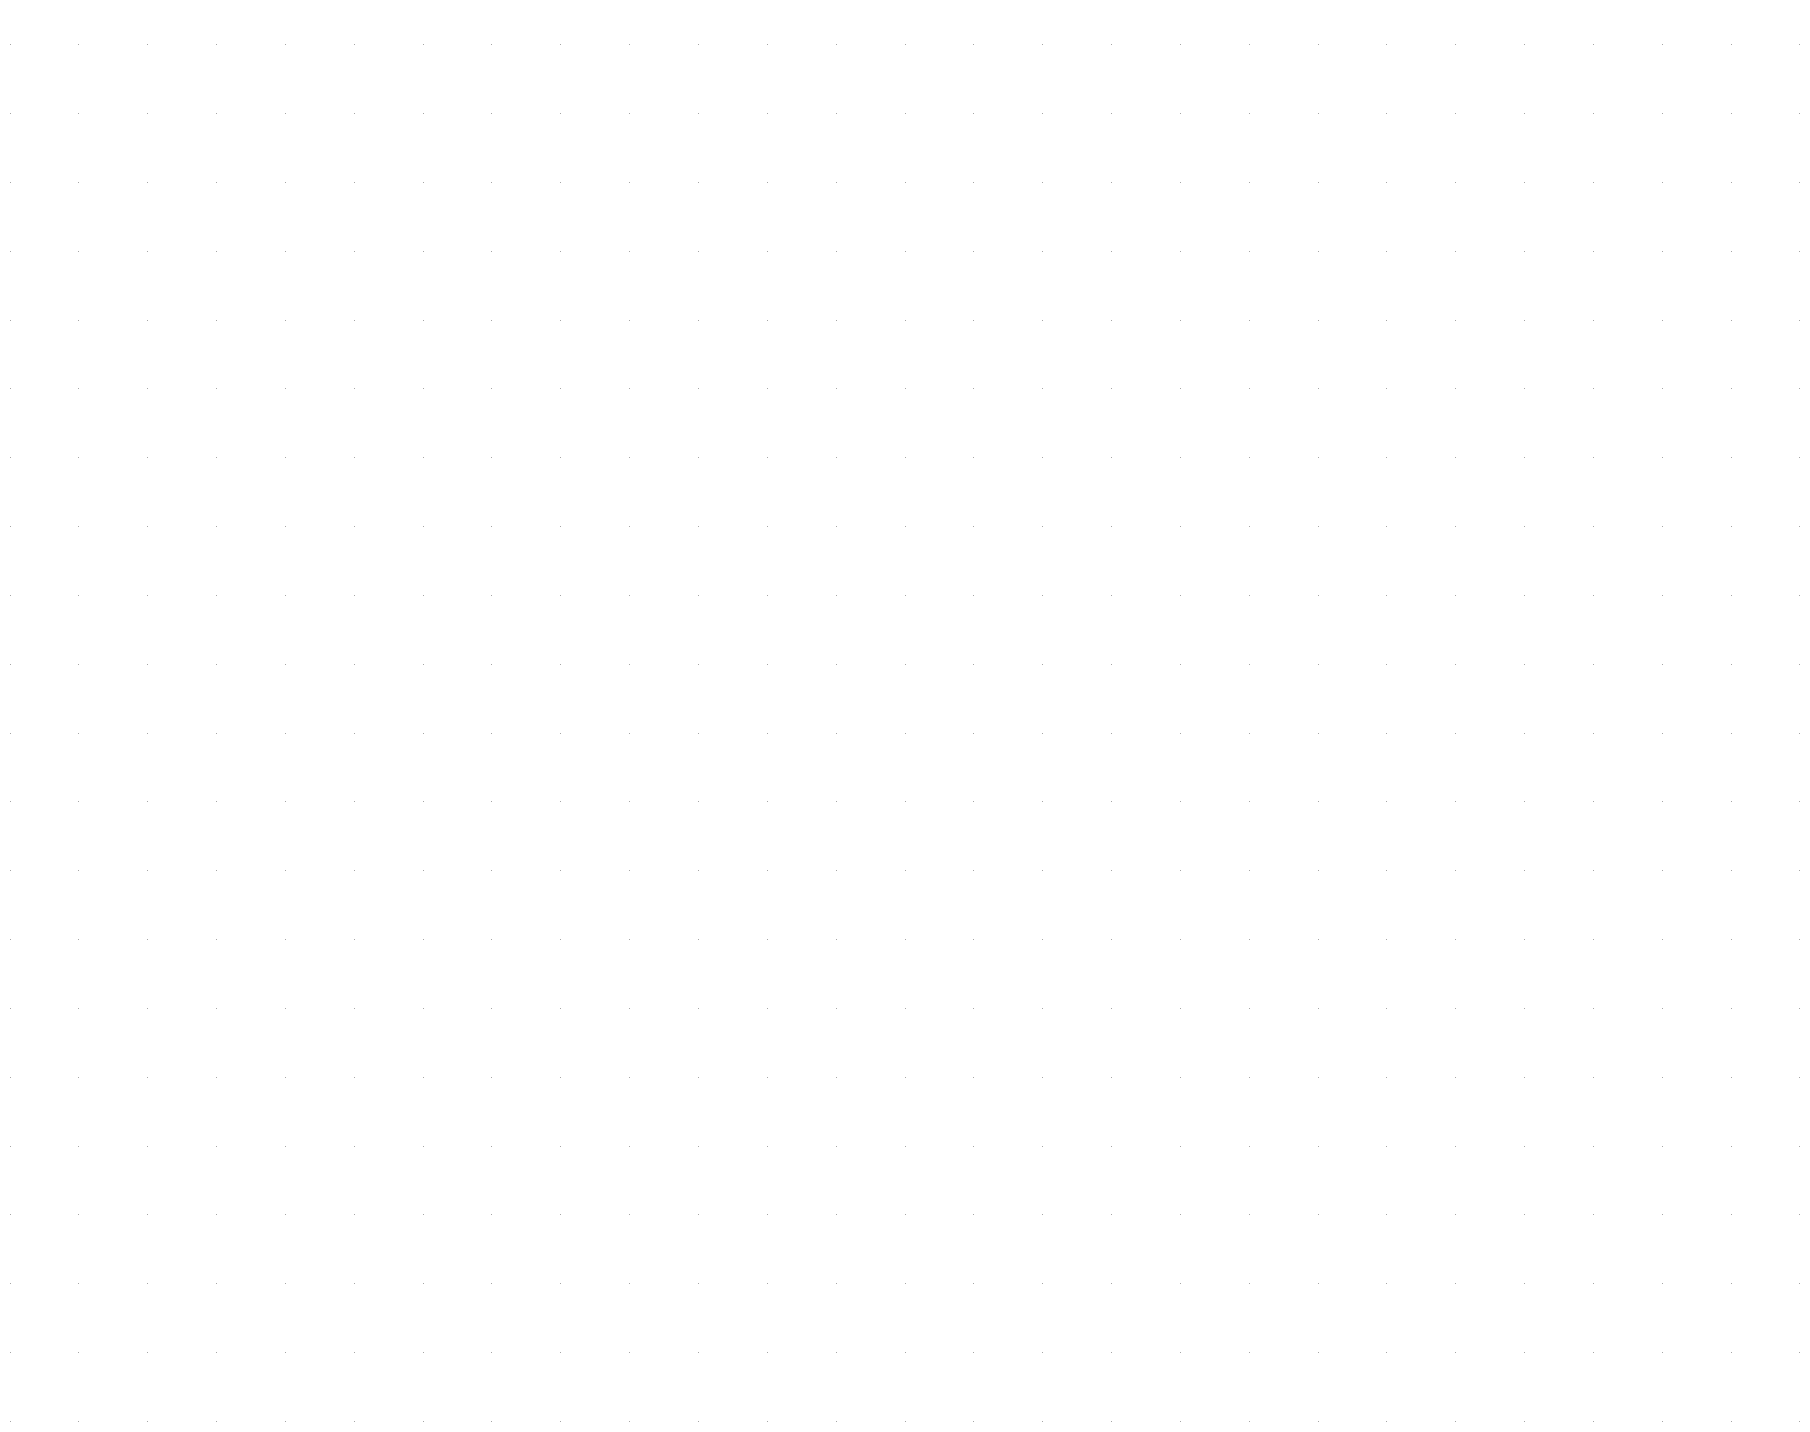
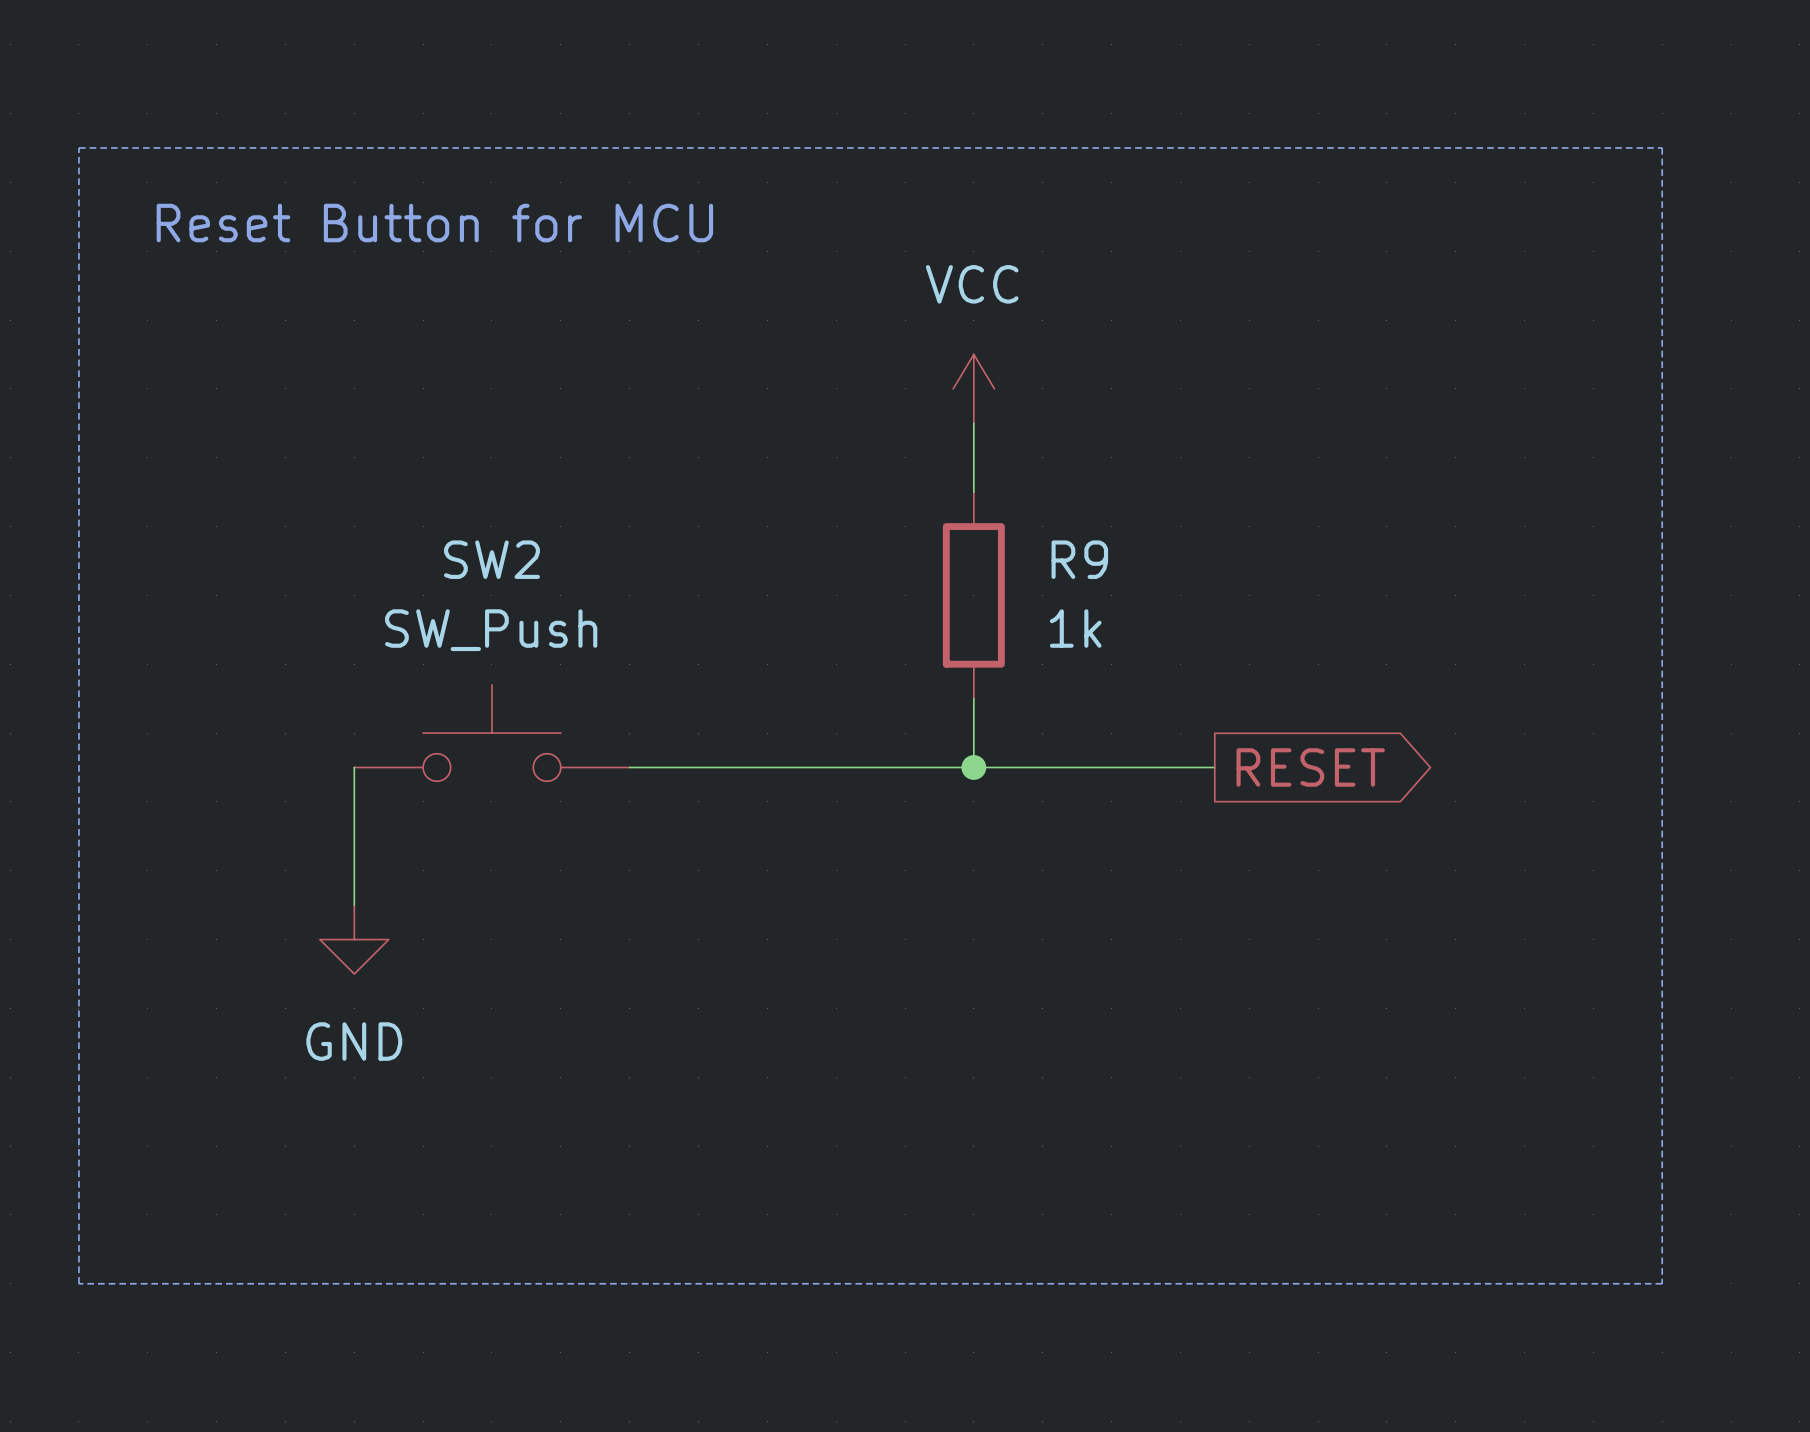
line: none -> (78, 147) (1662, 147) (1662, 1283) (78, 1283) (78, 147)
text: none -> Reset Button for MCU (434, 223)
power symbol: none -> VCC (973, 388)
wire: none -> (973, 423) (973, 492)
R9: none -> 1k (973, 595)
wire: none -> (973, 698) (973, 767)
SW2: none -> SW_Push (491, 733)
wire: none -> (354, 767) (354, 905)
wire: none -> (629, 767) (1214, 767)
junction: none -> (973, 767)
global label: none -> RESET (1310, 767)
power symbol: none -> GND (354, 939)

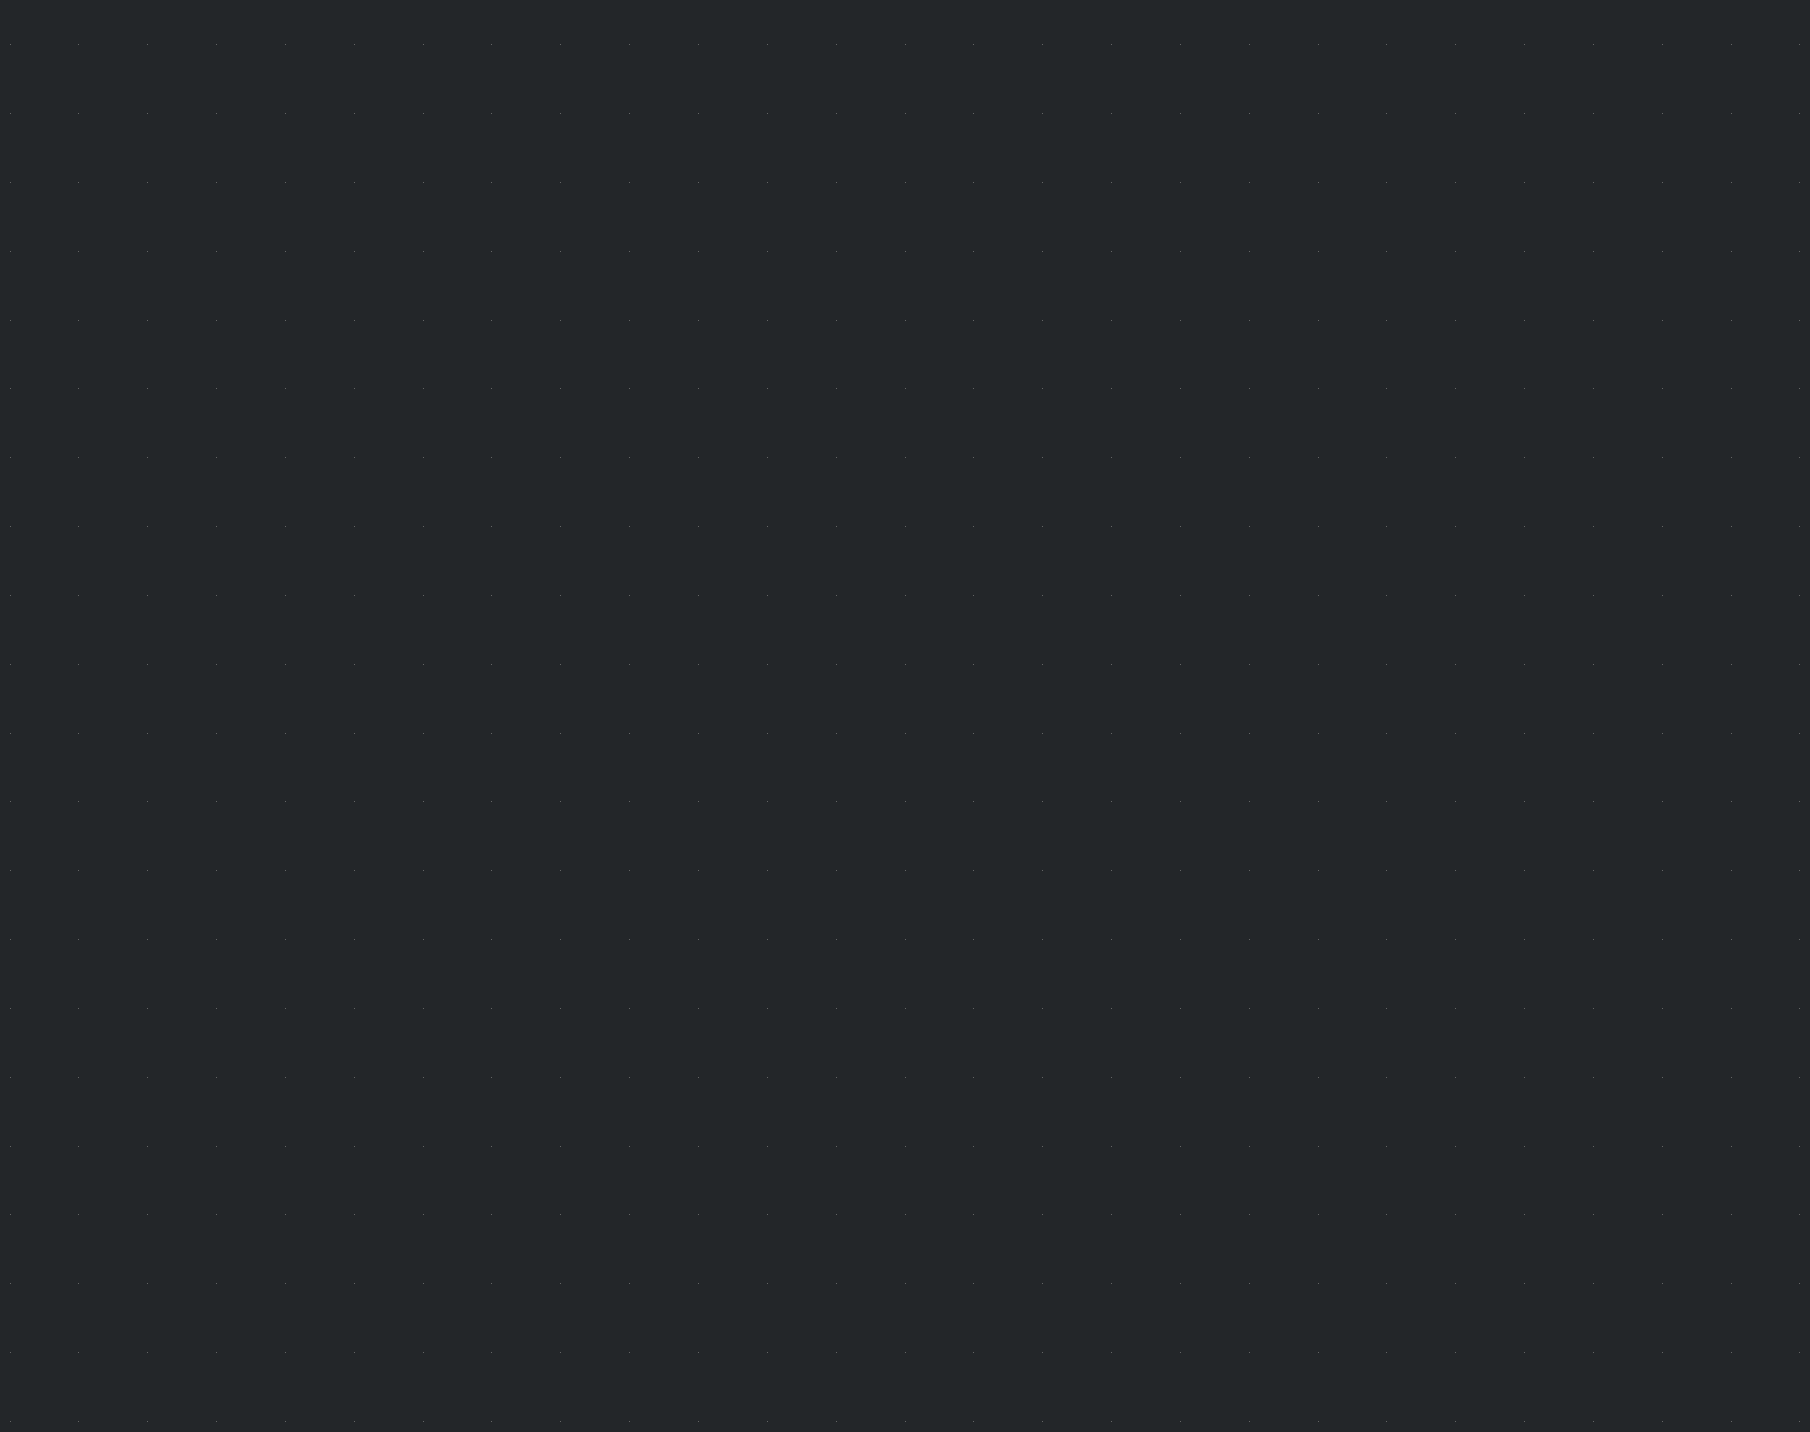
line: (78, 147) (1662, 147) (1662, 1283) (78, 1283) (78, 147) -> none
text: Reset Button for MCU (434, 223) -> none
power symbol: VCC (973, 388) -> none
wire: (973, 423) (973, 492) -> none
R9: 1k (973, 595) -> none
wire: (973, 698) (973, 767) -> none
SW2: SW_Push (491, 733) -> none
wire: (354, 767) (354, 905) -> none
wire: (629, 767) (1214, 767) -> none
junction: (973, 767) -> none
global label: RESET (1310, 767) -> none
power symbol: GND (354, 939) -> none

